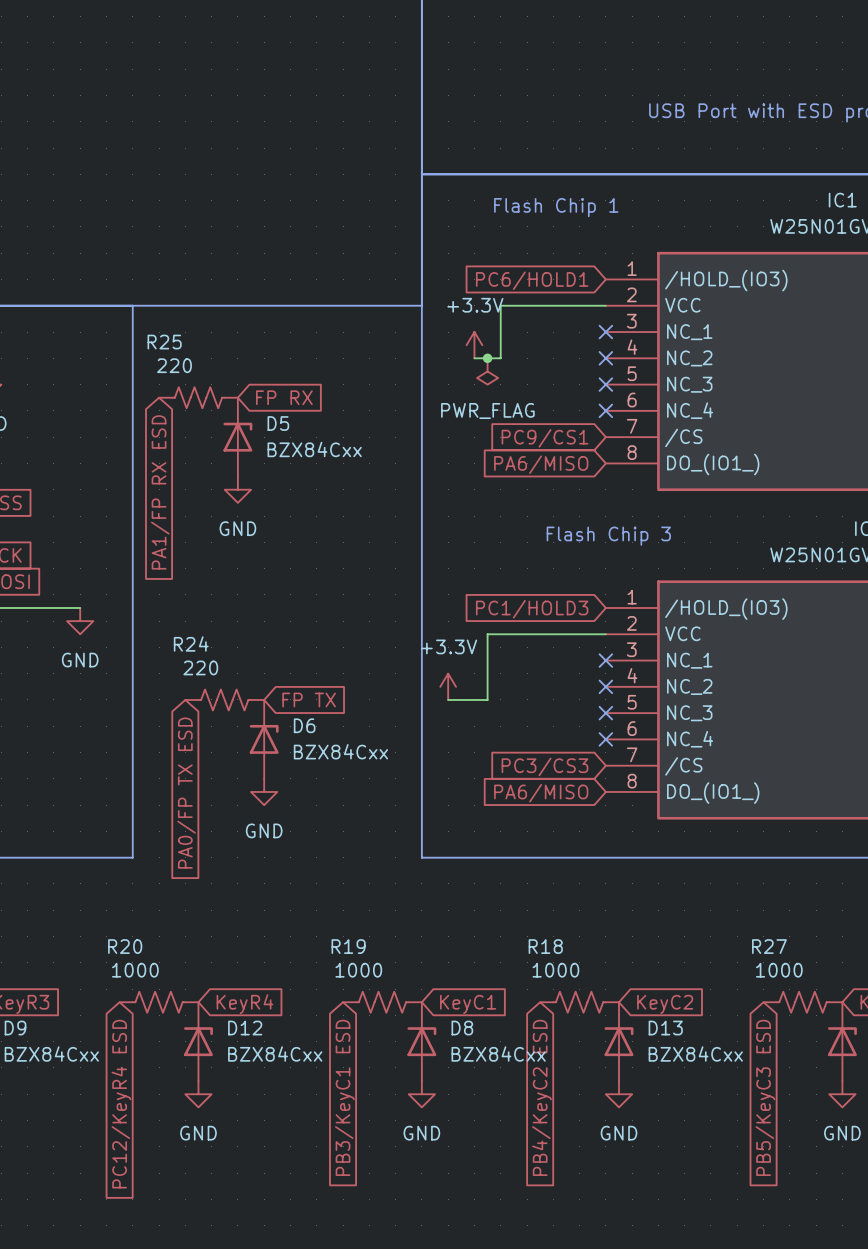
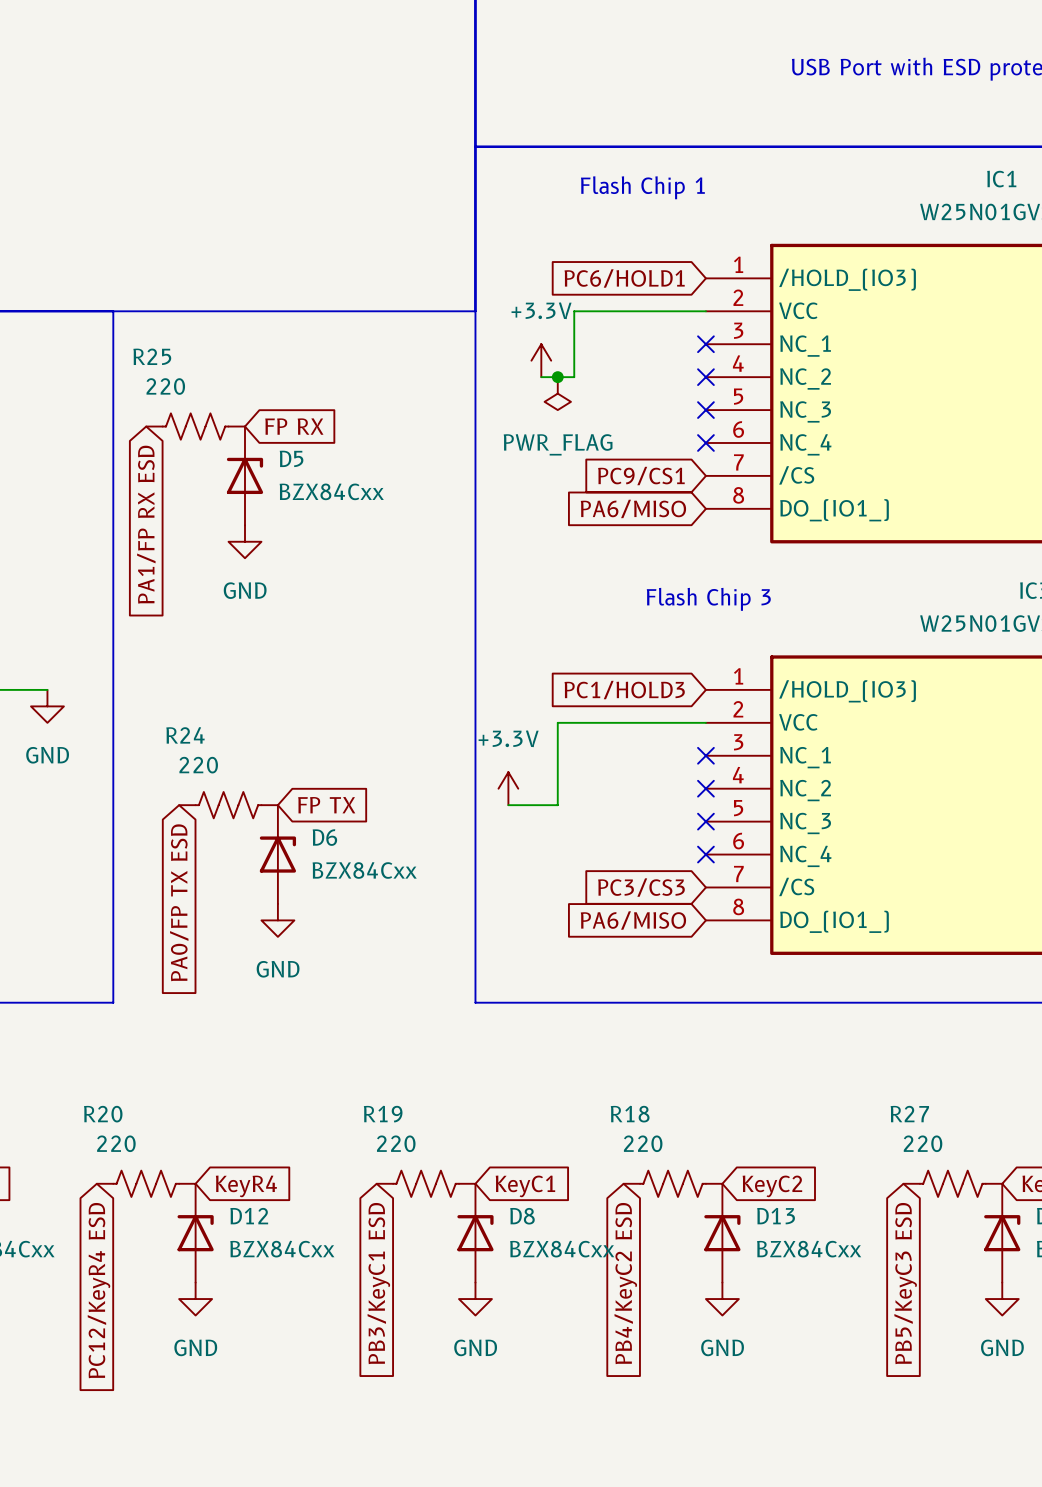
R20 value: 1000 (135, 970) -> 220 (116, 1143)
R19 value: 1000 (358, 970) -> 220 (396, 1143)
R18 value: 1000 (555, 970) -> 220 (643, 1143)
R27 value: 1000 (779, 970) -> 220 (923, 1143)

